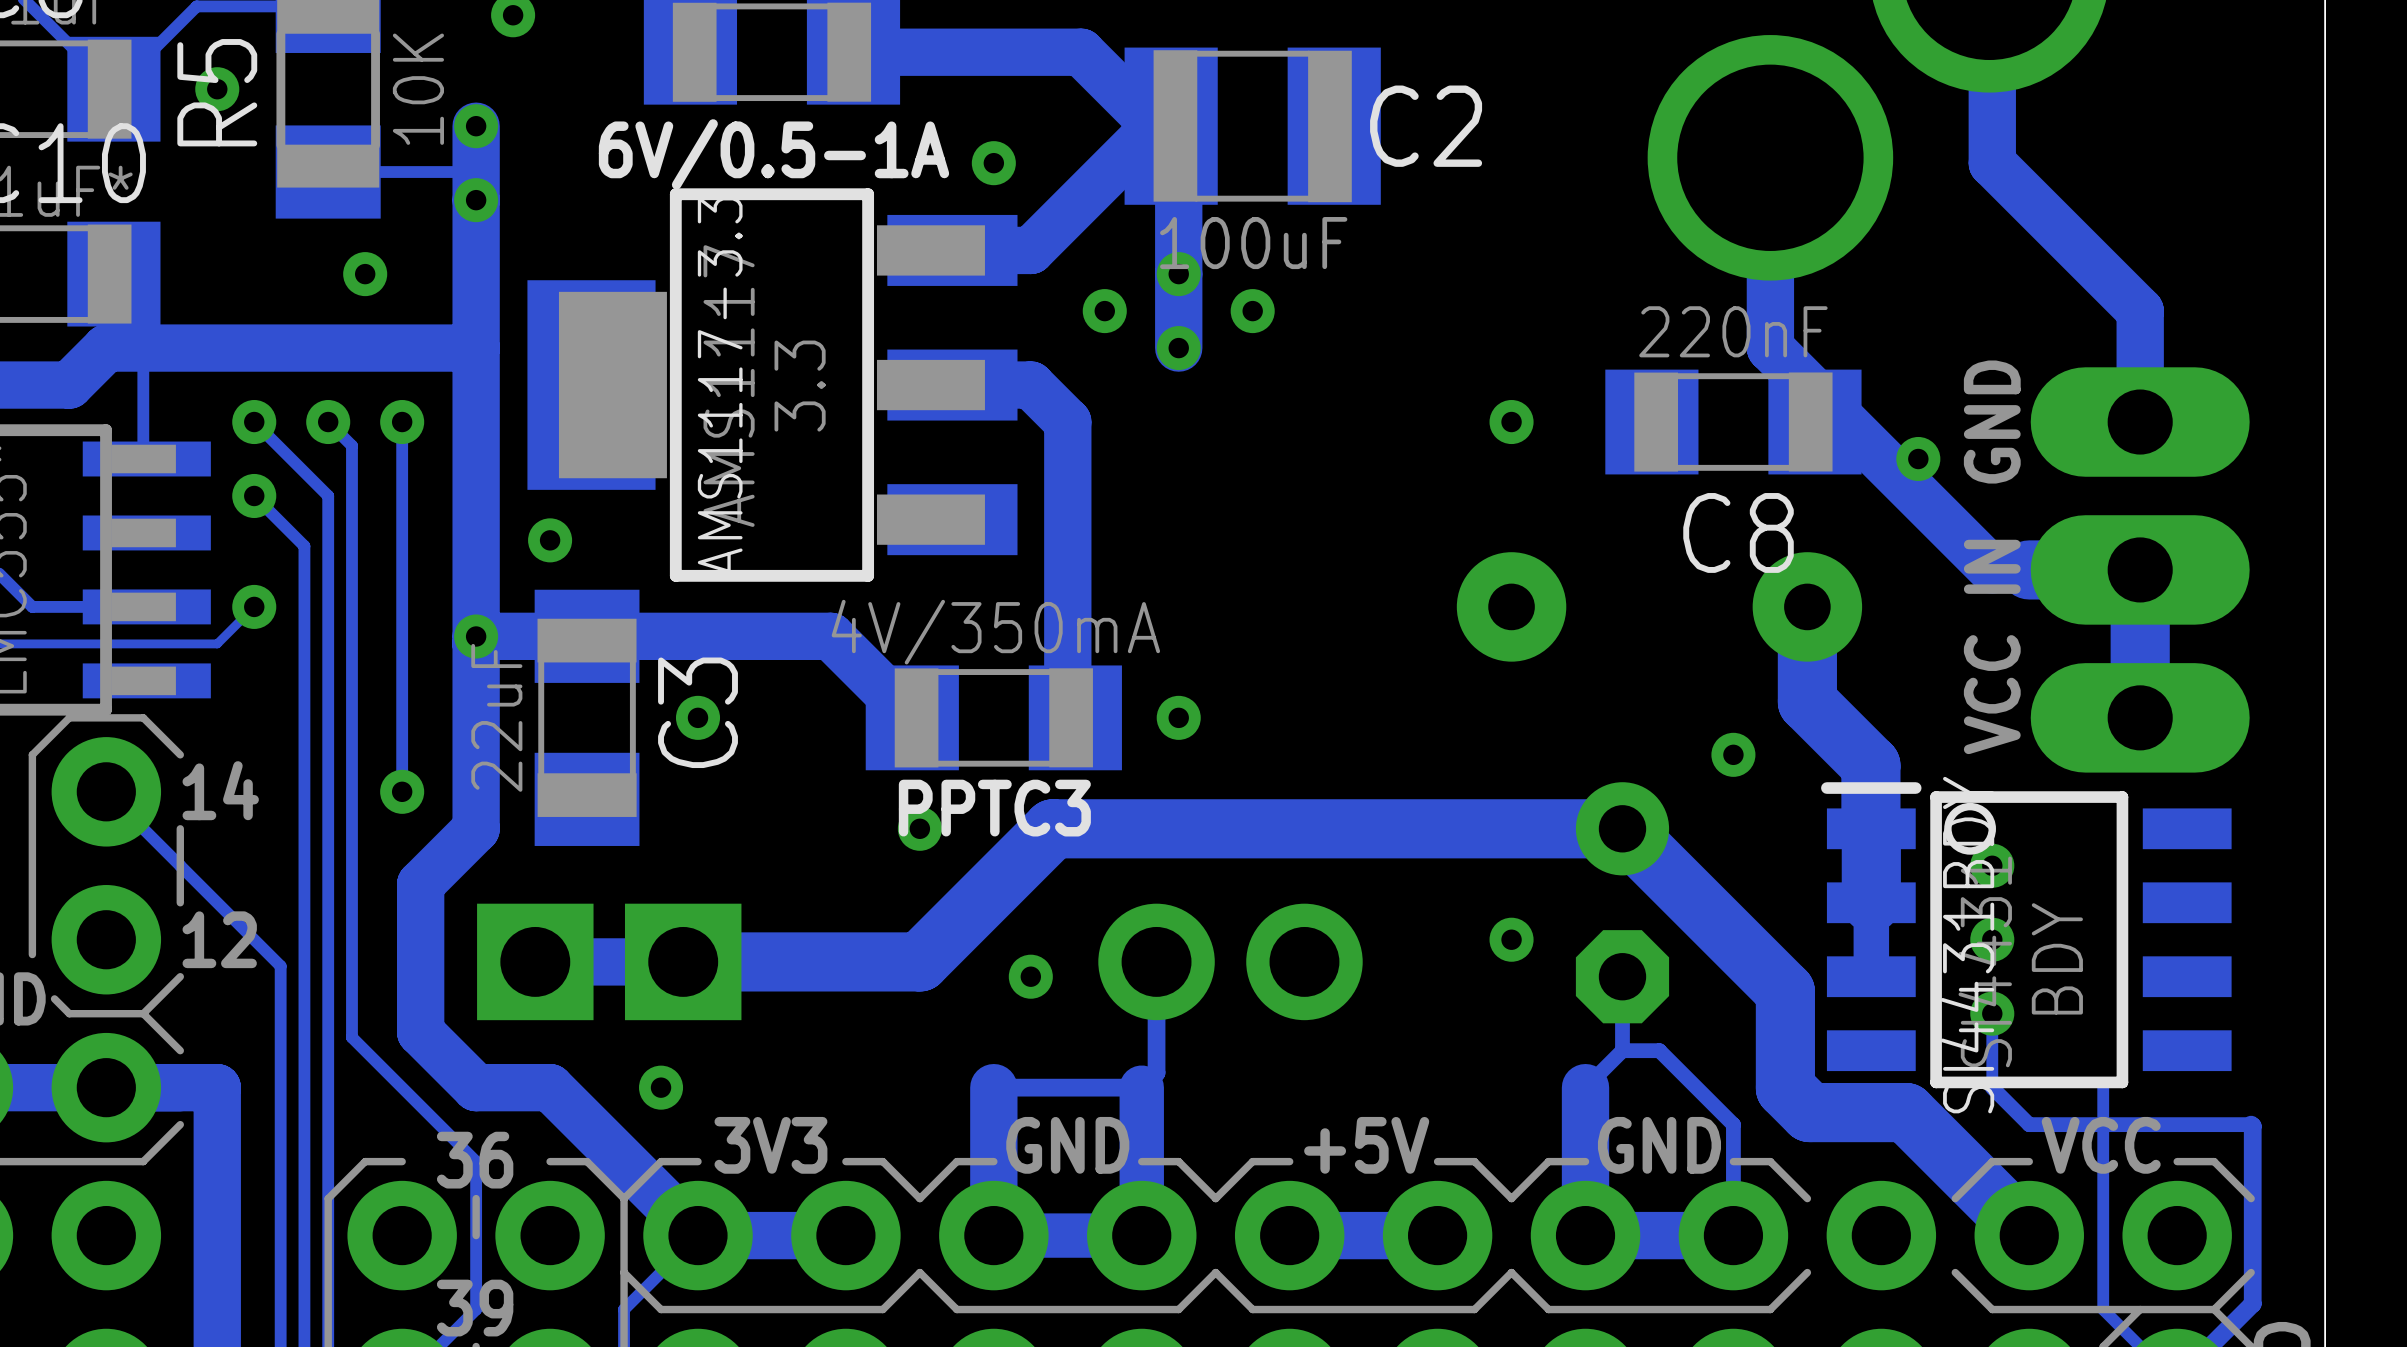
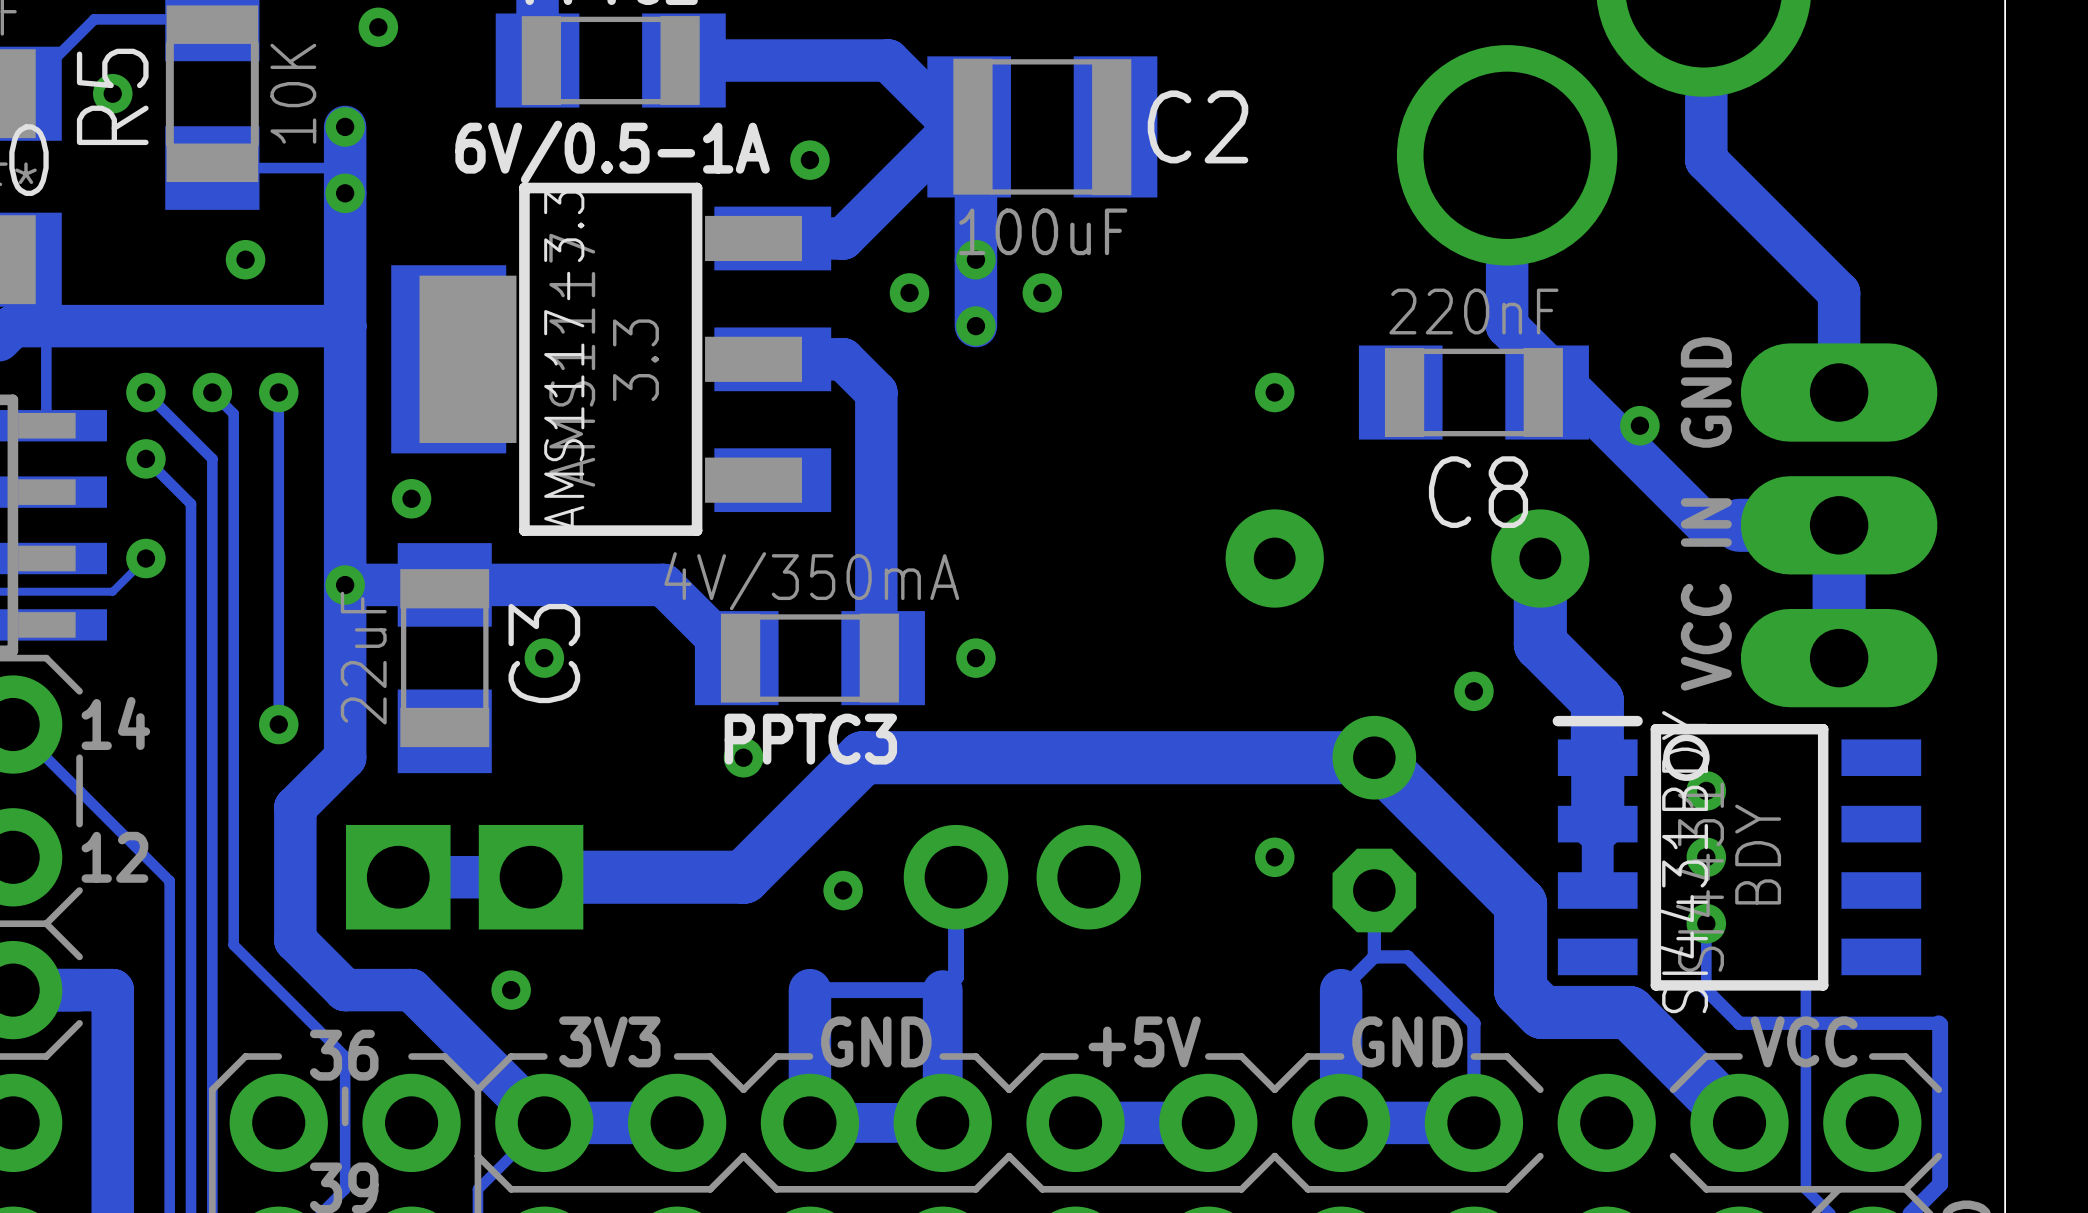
text position: BDY (2057, 958) -> BDY (1758, 854)

